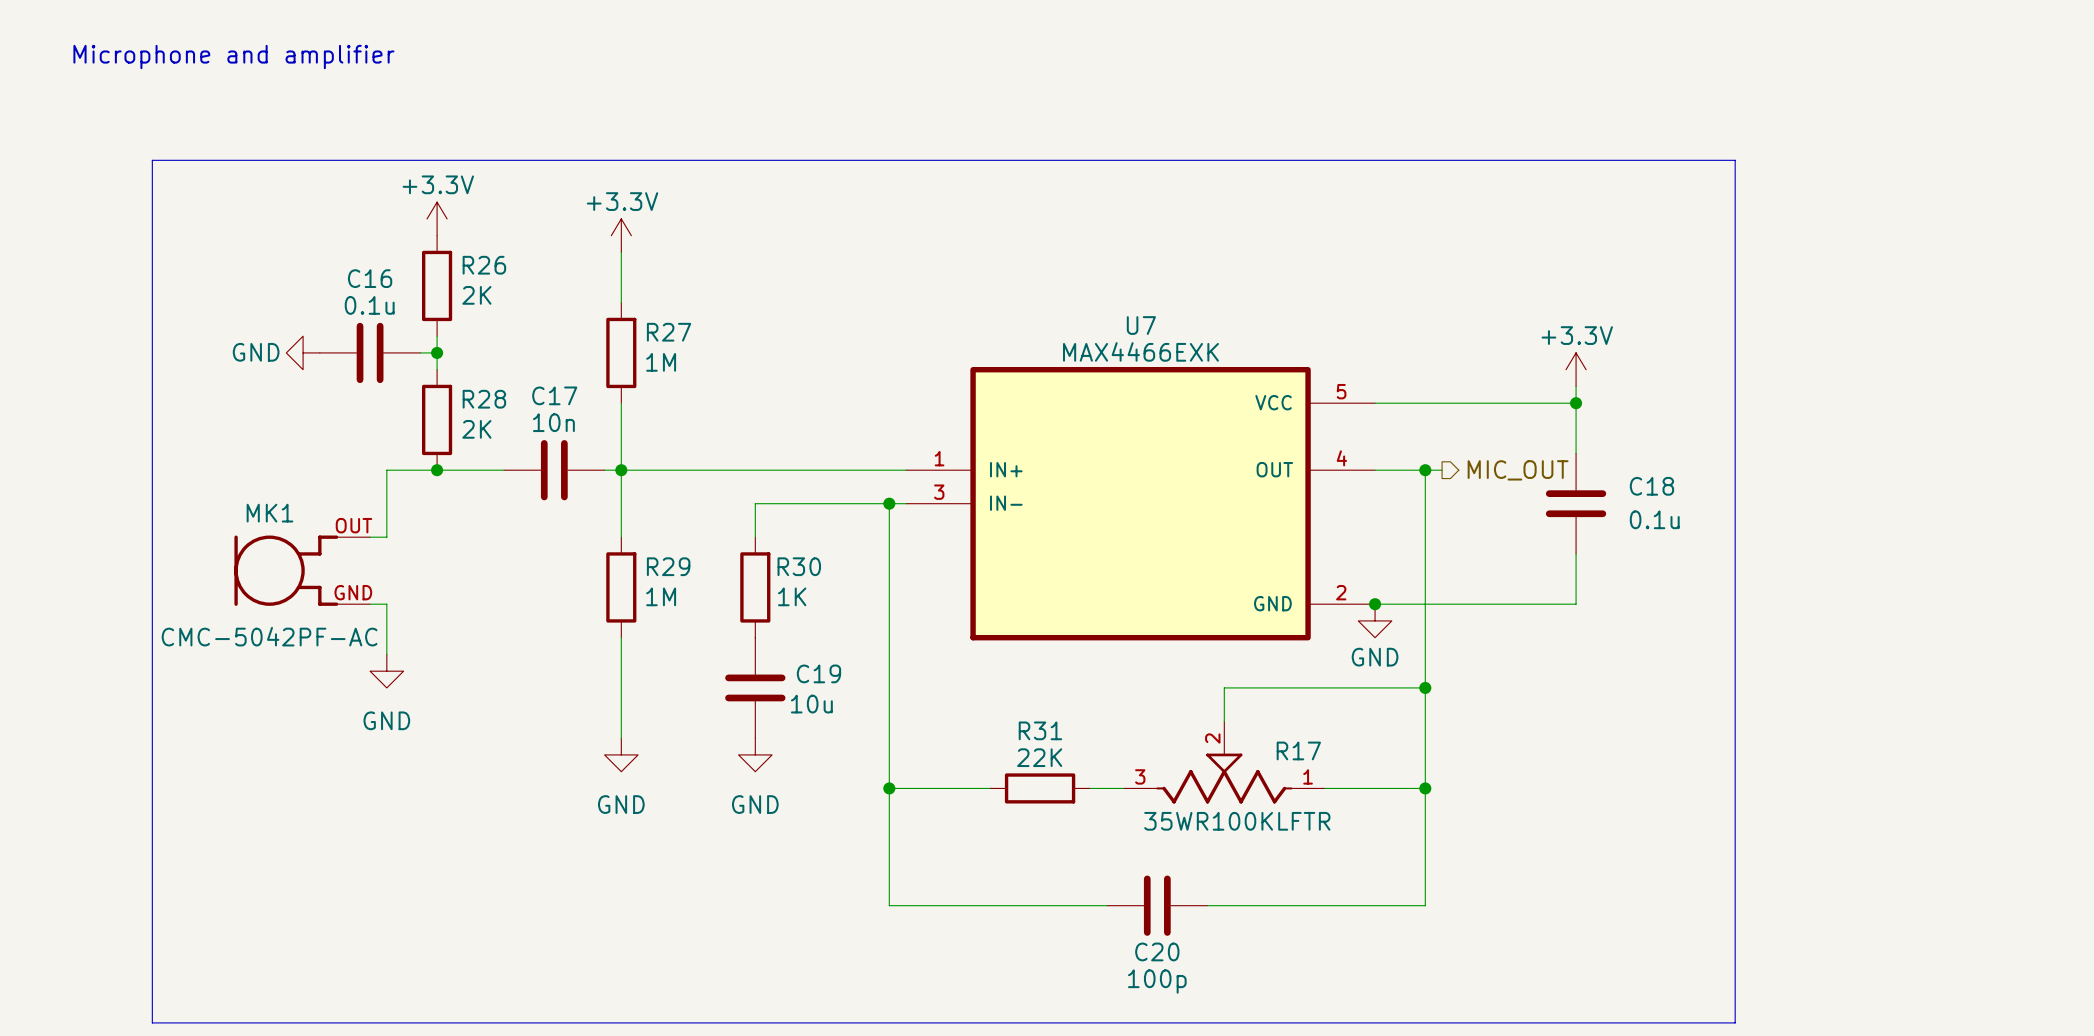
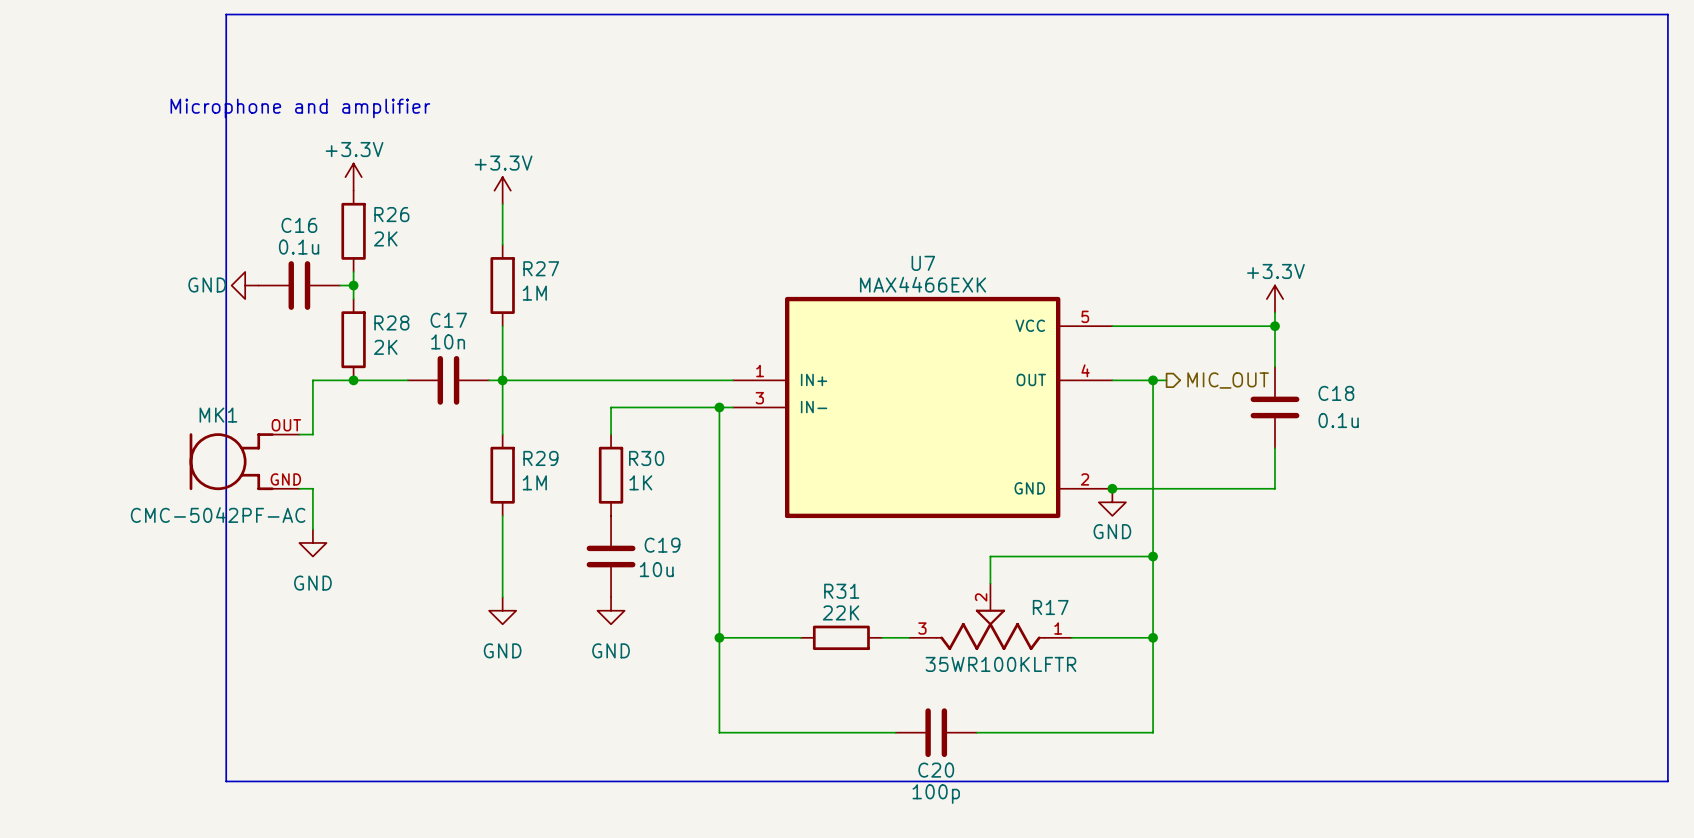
text position: Microphone and amplifier (233, 57) -> Microphone and amplifier (300, 108)
line: (152, 160) (1735, 160) (1735, 1022) (152, 1022) (152, 160) -> (226, 14) (226, 781) (1667, 781) (1667, 14) (226, 14)

